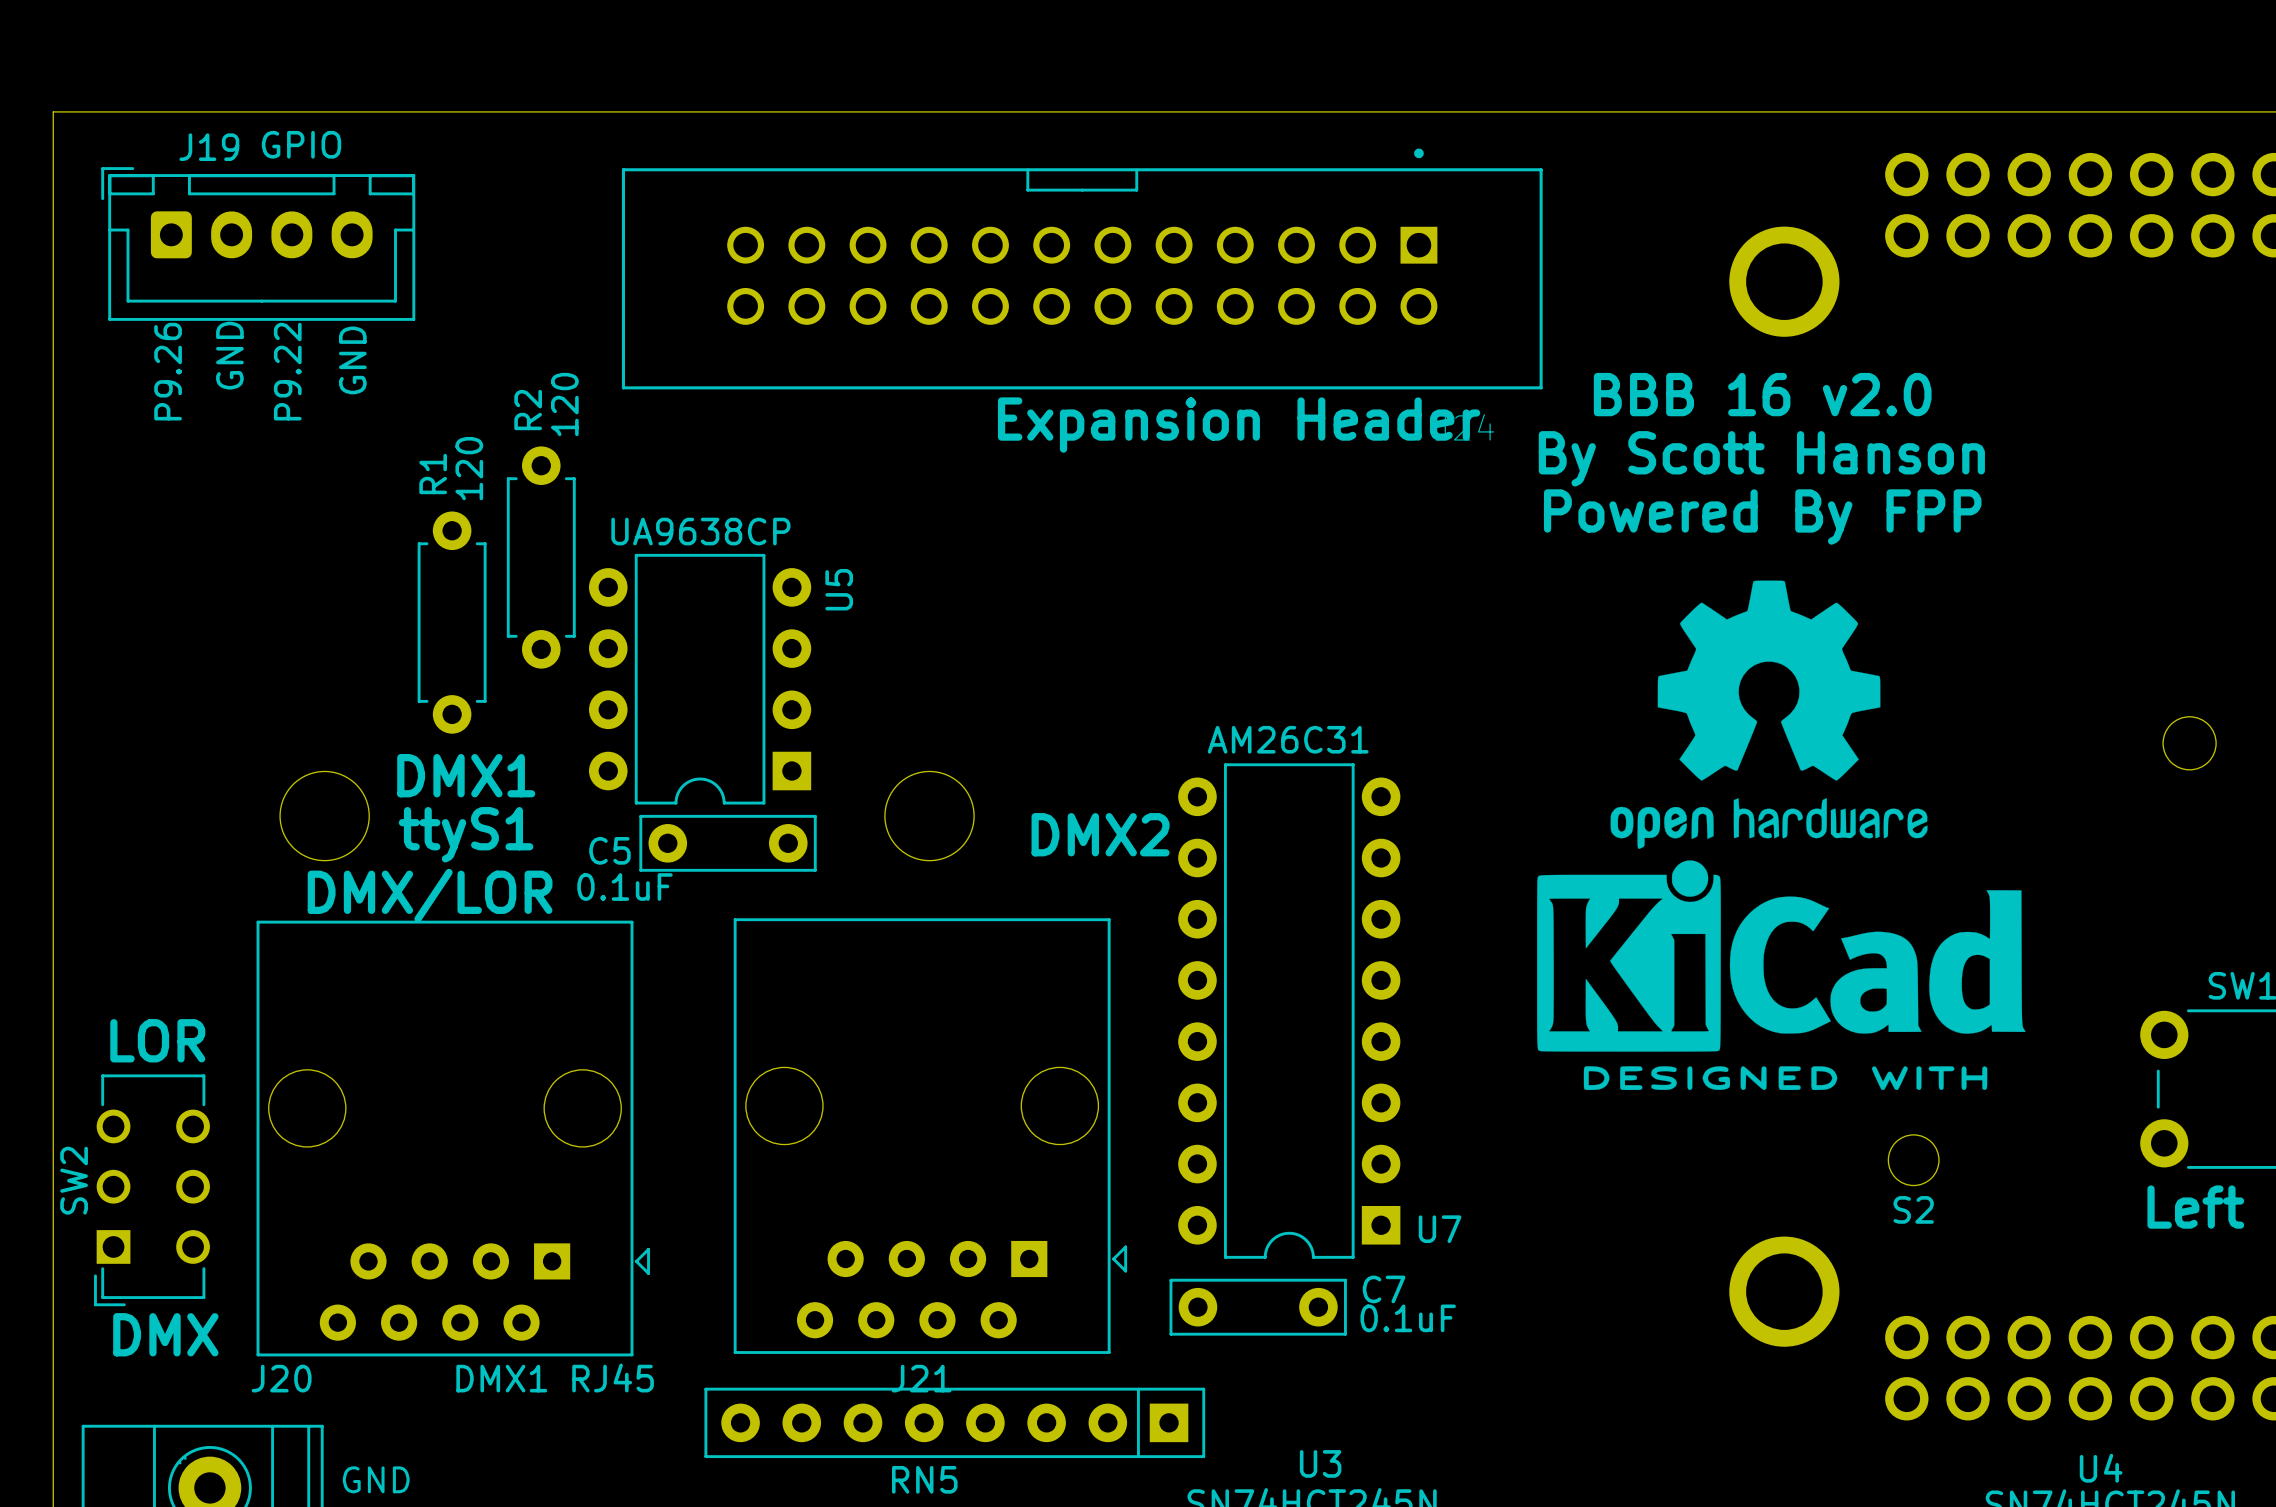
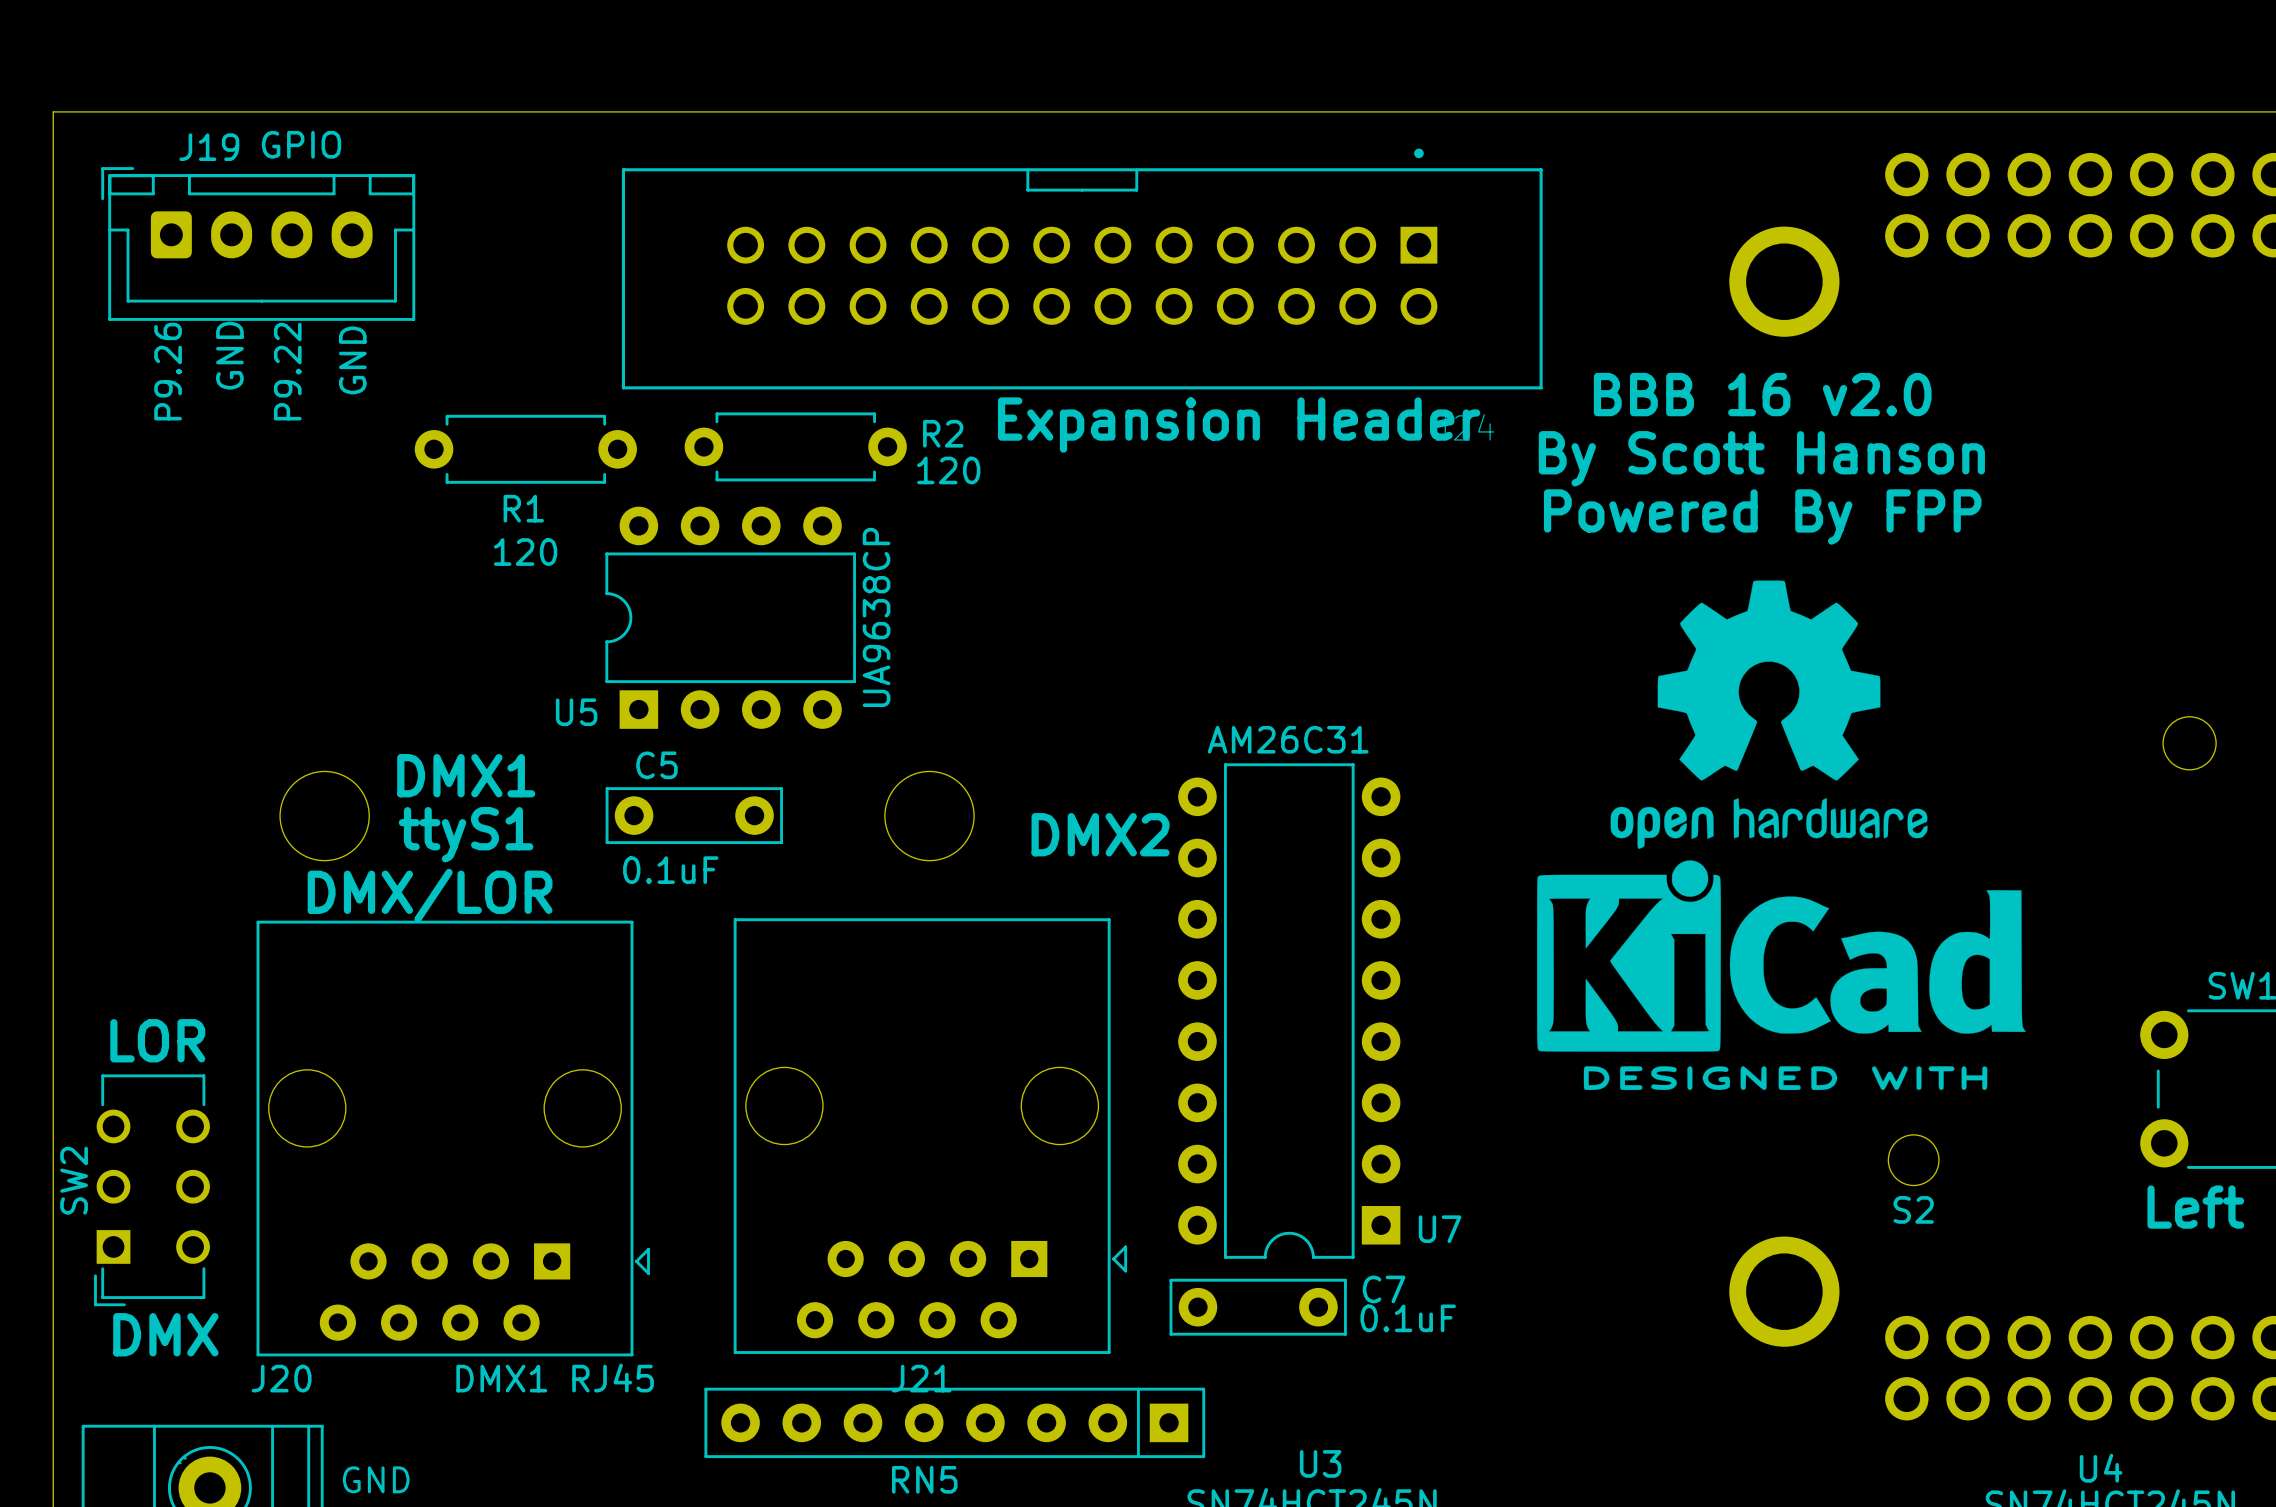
R1 value position: 120 (469, 468) -> 120 (525, 552)
R1 name position: R1 (433, 474) -> R1 (523, 508)
R2 rotation: 0° (541, 557) -> 90° clockwise (795, 446)
R2 position: (541, 557) -> (795, 446)
U5 name position: U5 (839, 589) -> U5 (576, 712)
R1 rotation: 0° (452, 622) -> 90° clockwise (525, 449)
R1 position: (452, 622) -> (525, 449)
U5 rotation: 0° (700, 679) -> 90° clockwise (730, 617)
C5 position: (728, 843) -> (694, 815)
C5 name position: C5 (609, 850) -> C5 (656, 765)
C5 value position: 0.1uF (624, 887) -> 0.1uF (670, 870)

